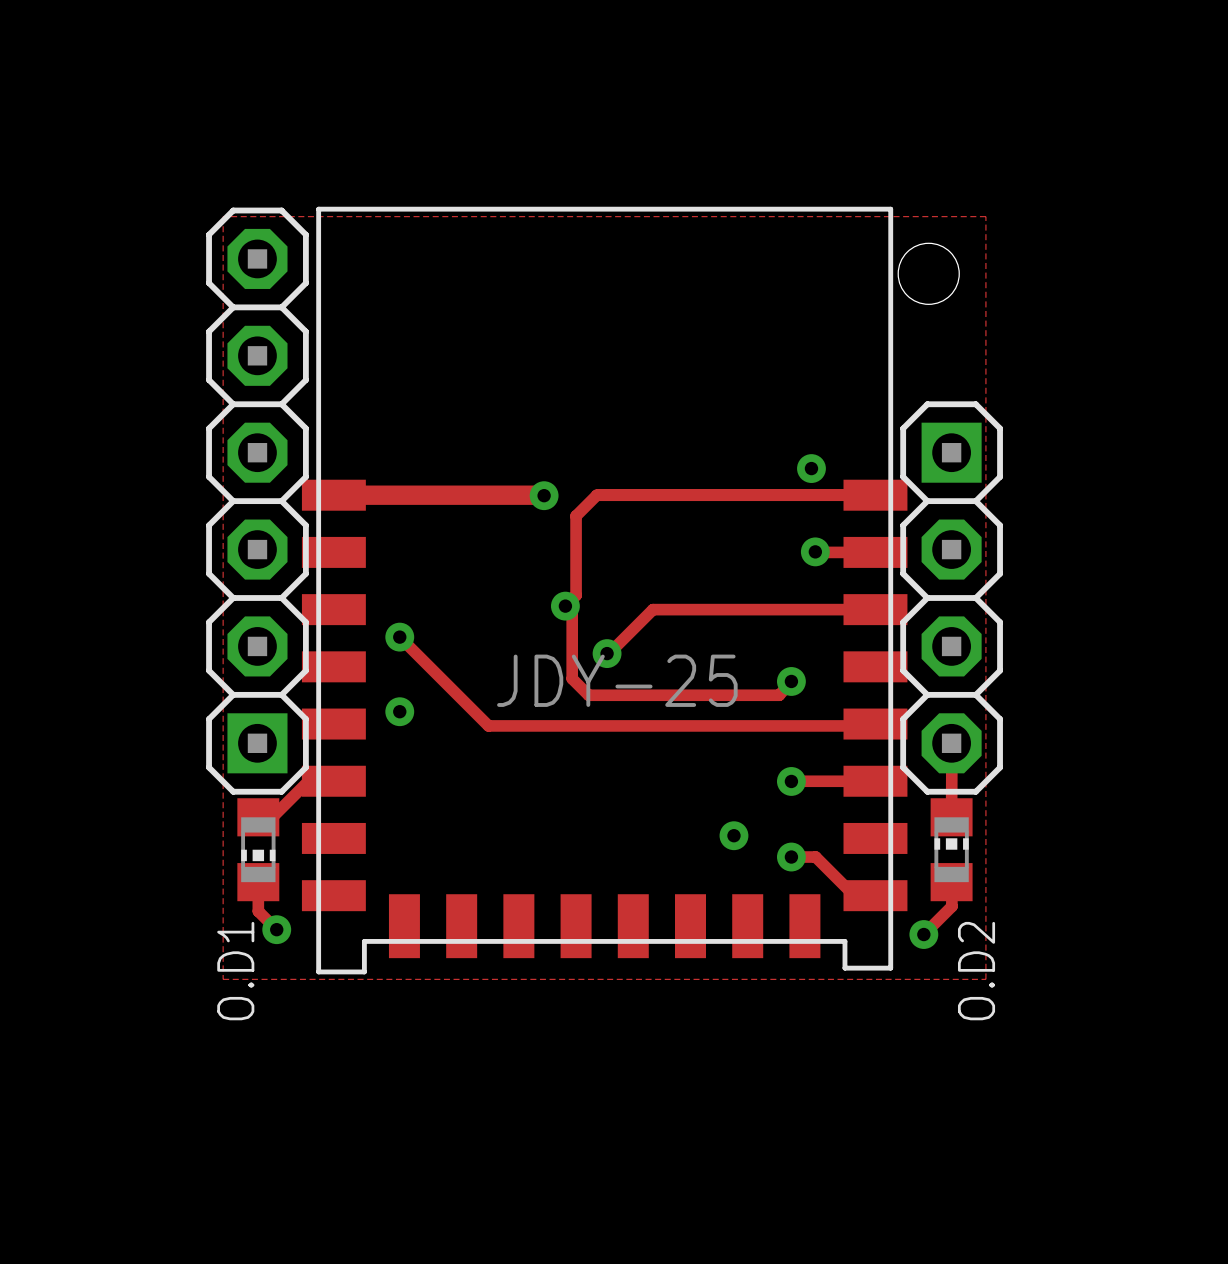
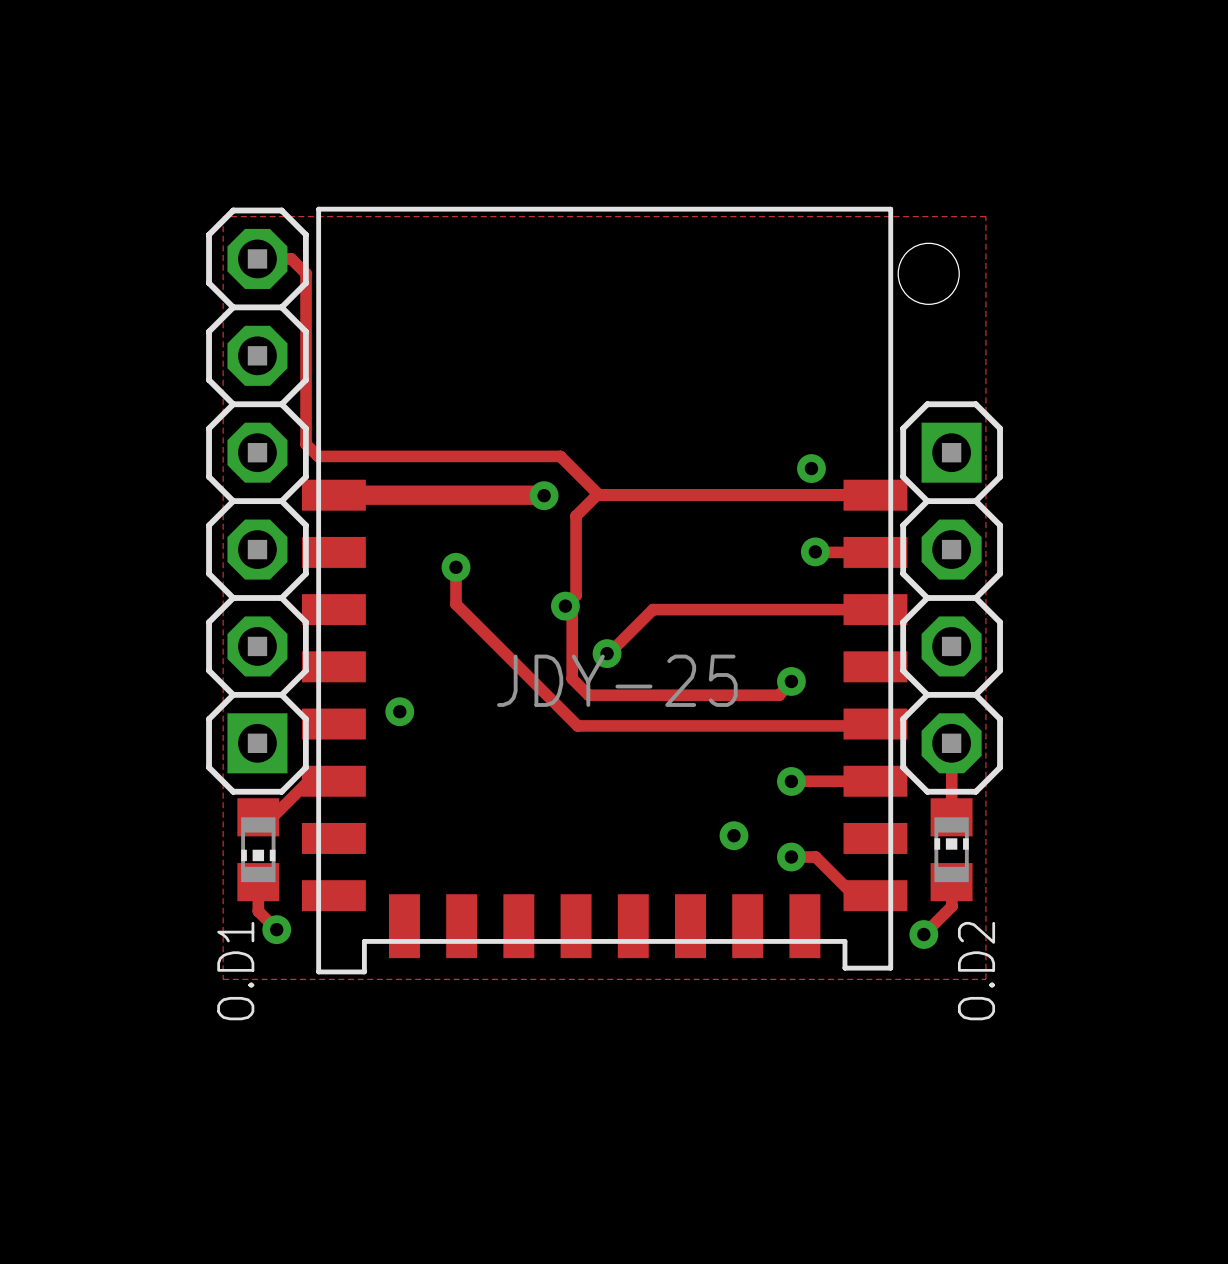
track: none -> (257, 258) (291, 258) (306, 273) (306, 444) (318, 456) (560, 456) (599, 495)
track: (399, 637) (488, 725) (577, 725) -> (456, 567) (456, 604) (577, 725)
via position: (399, 637) -> (456, 567)

